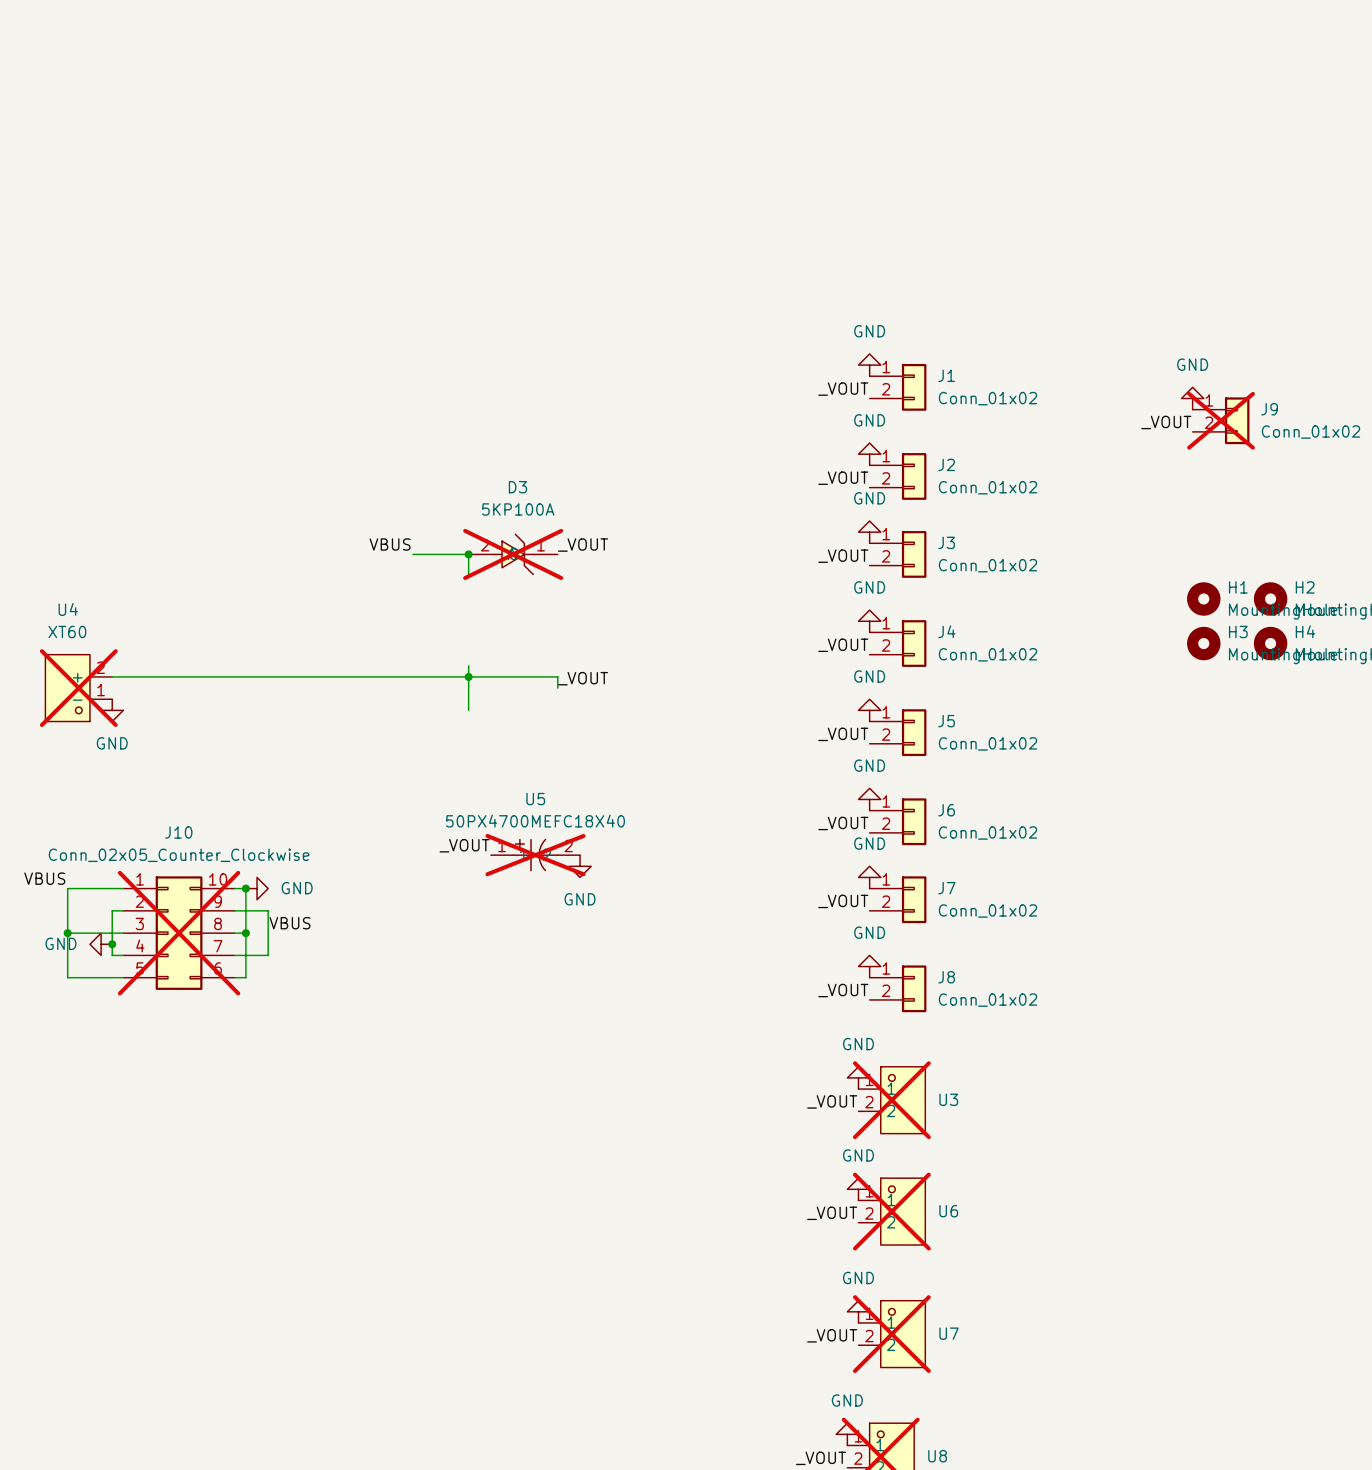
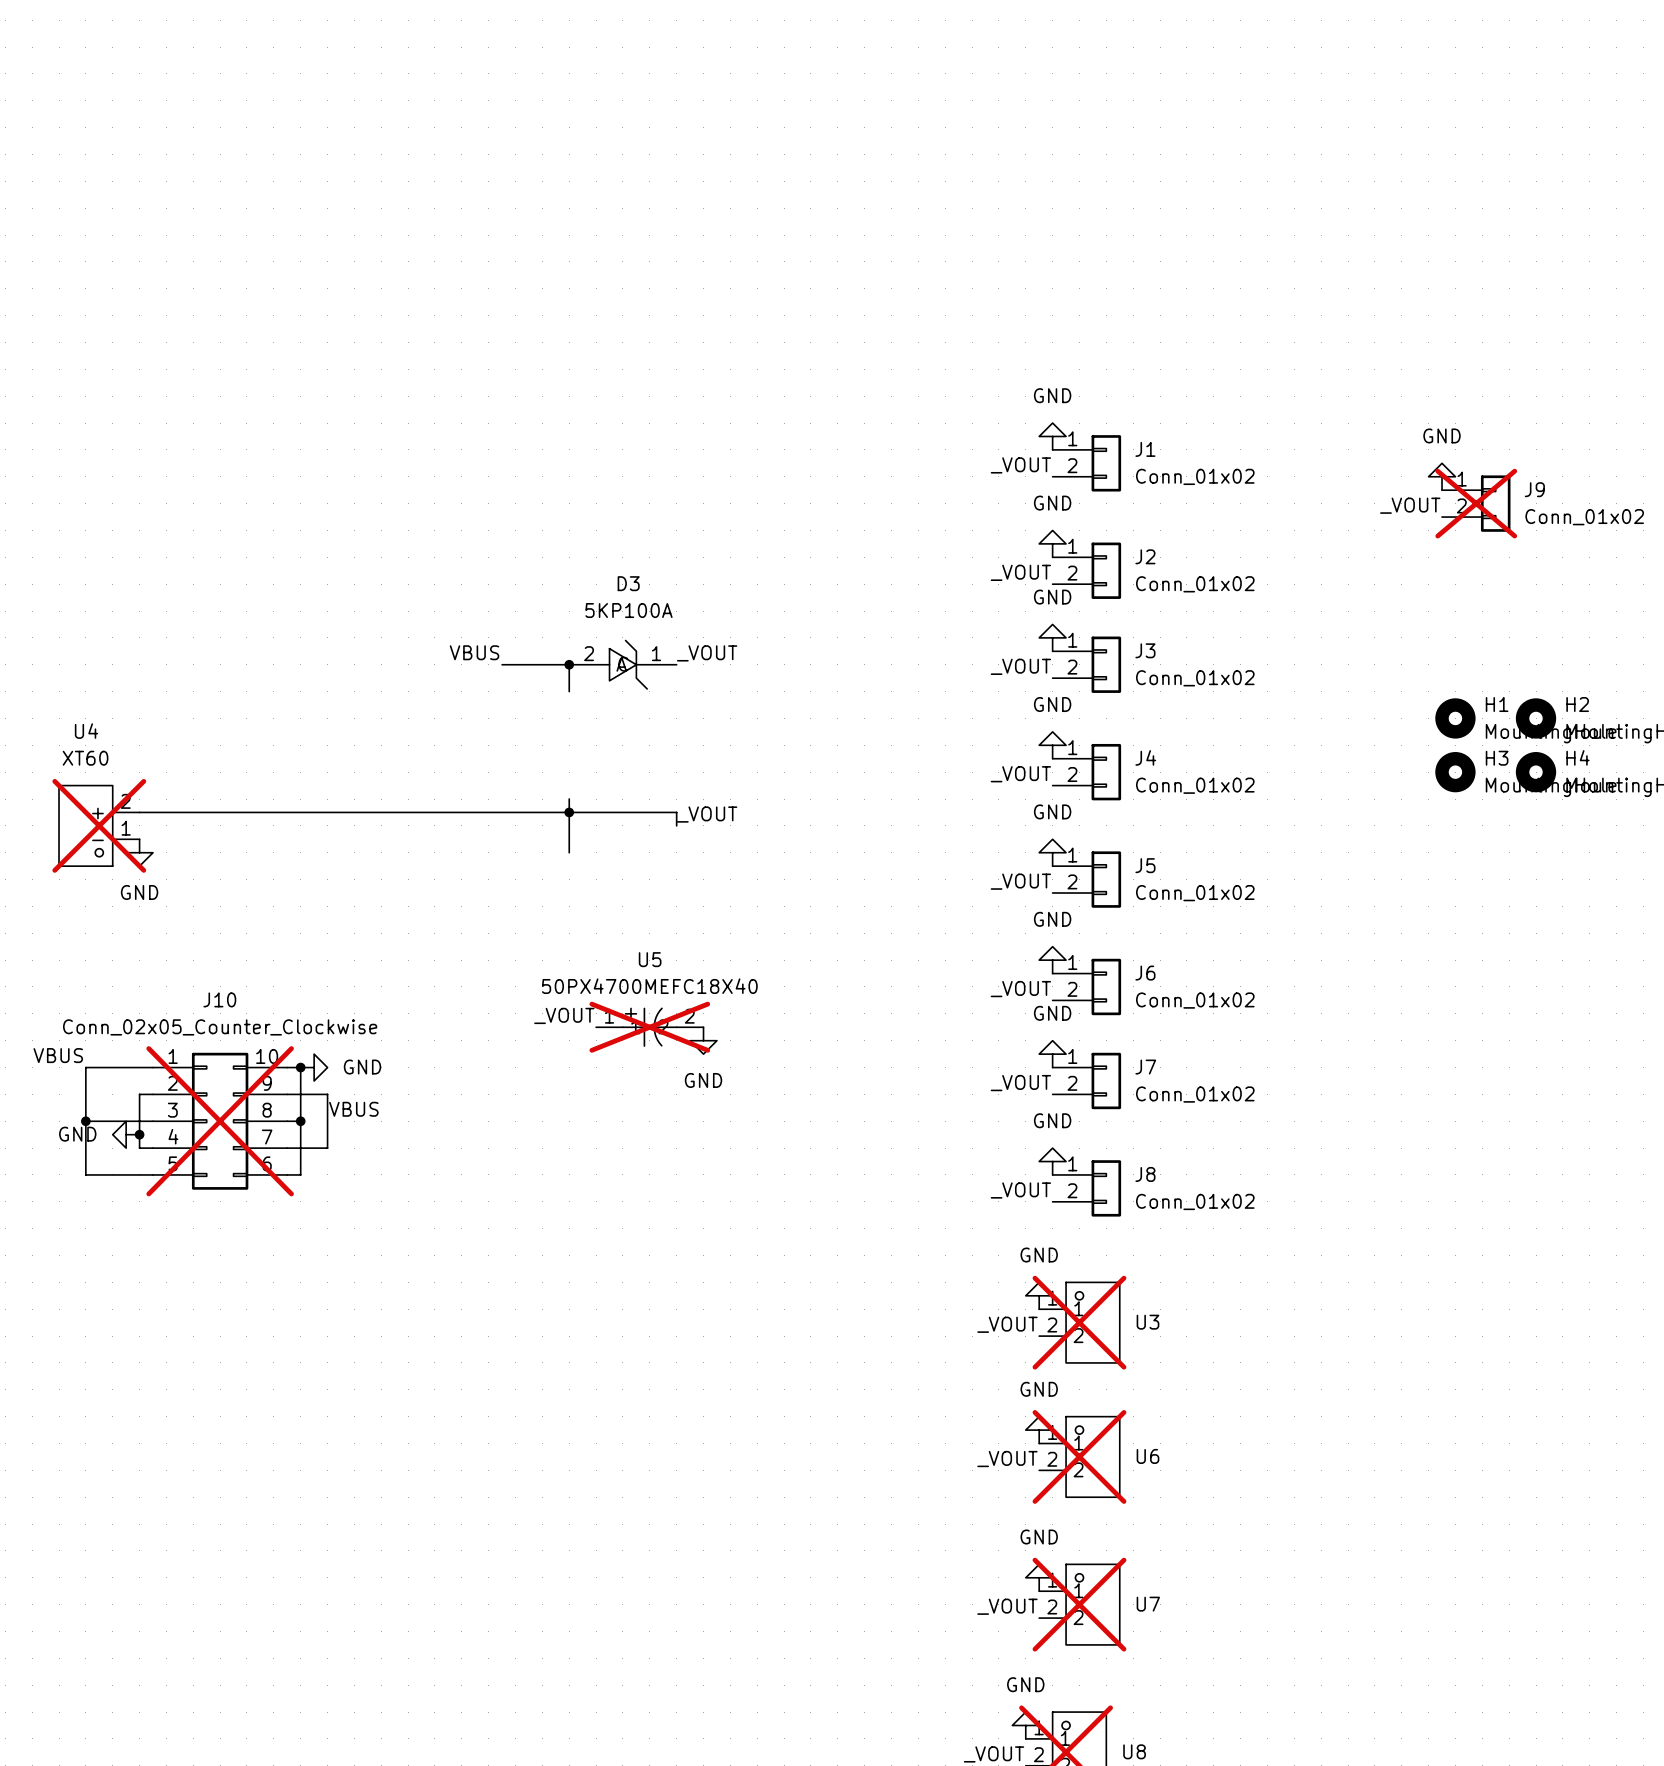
D3 do-not-place cross: (513, 554) -> none

